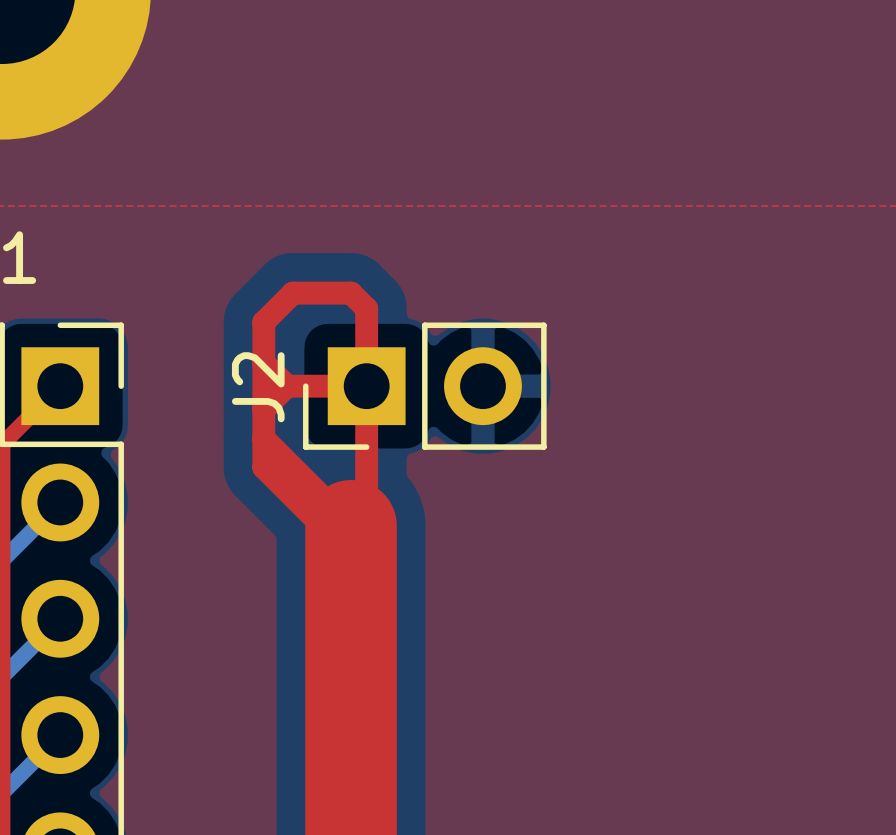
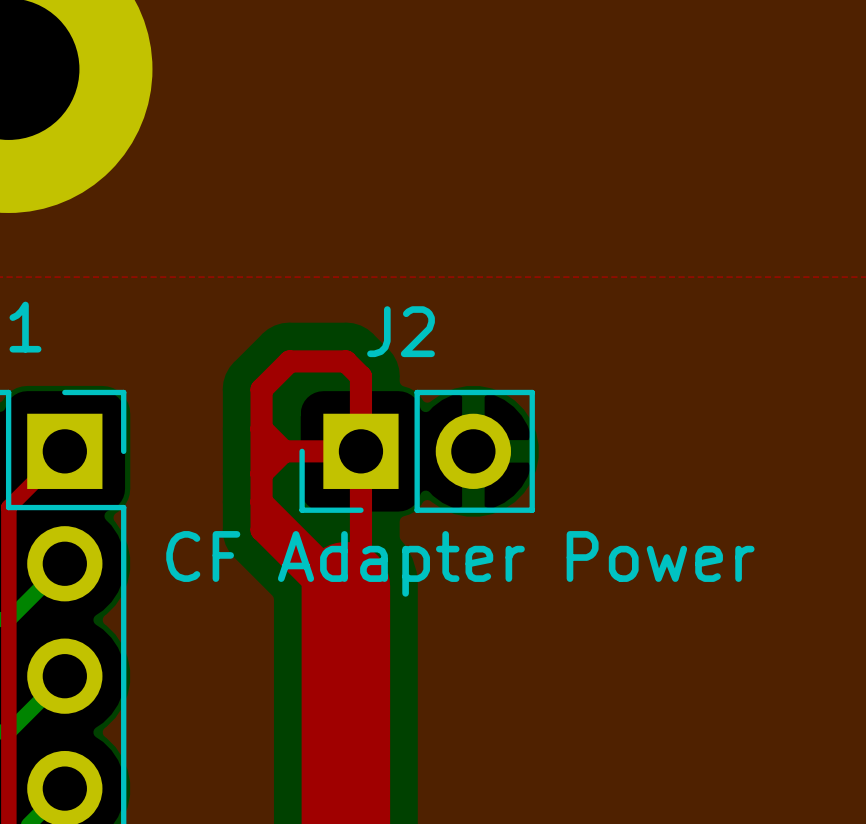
J2 name rotation: 0° (258, 387) -> 90° clockwise (401, 331)
J2 name position: J2 (258, 387) -> J2 (401, 331)
J2 value: none -> CF Adapter Power (460, 563)

